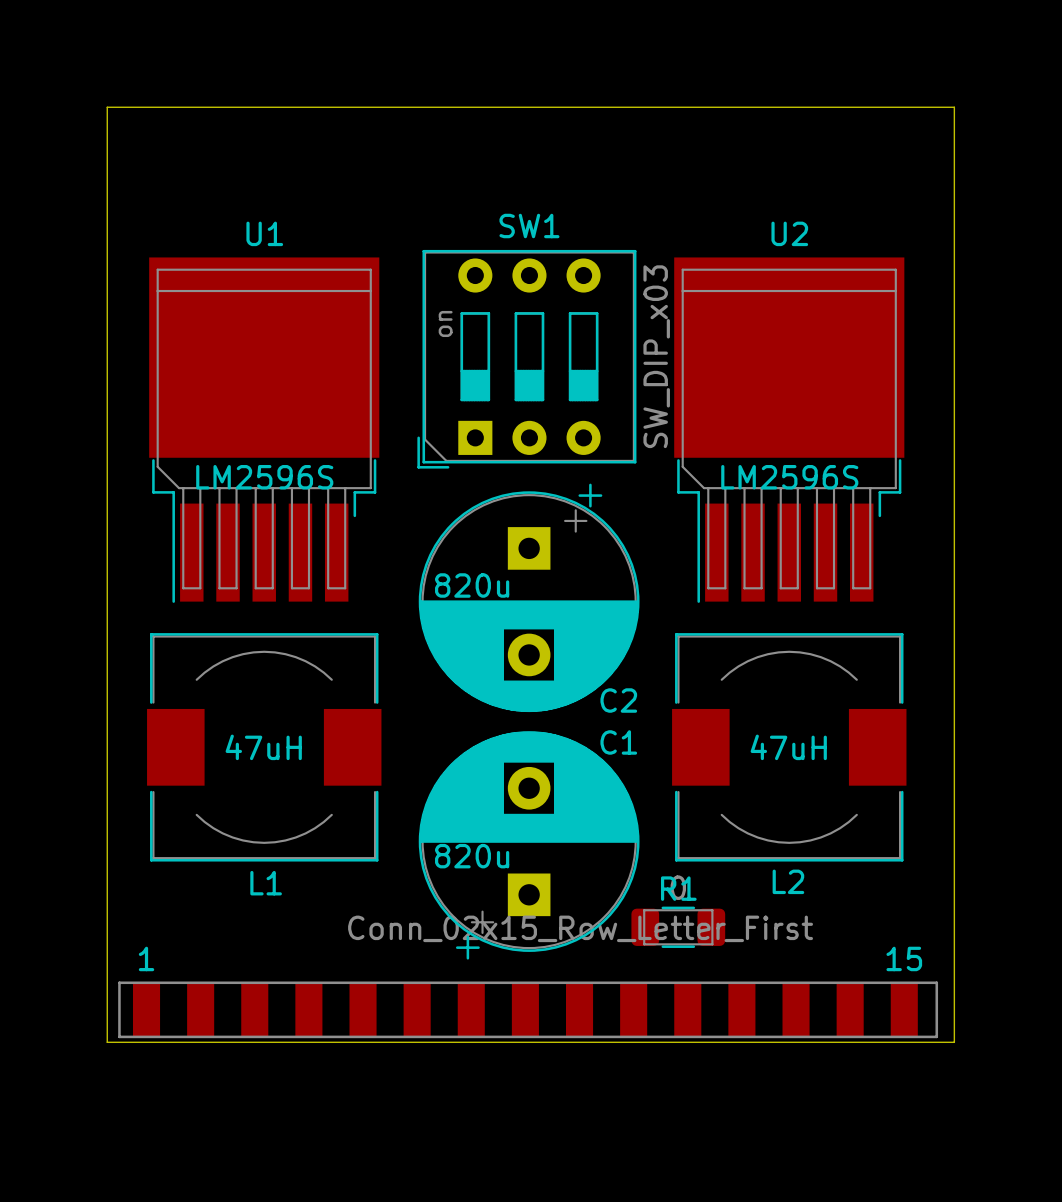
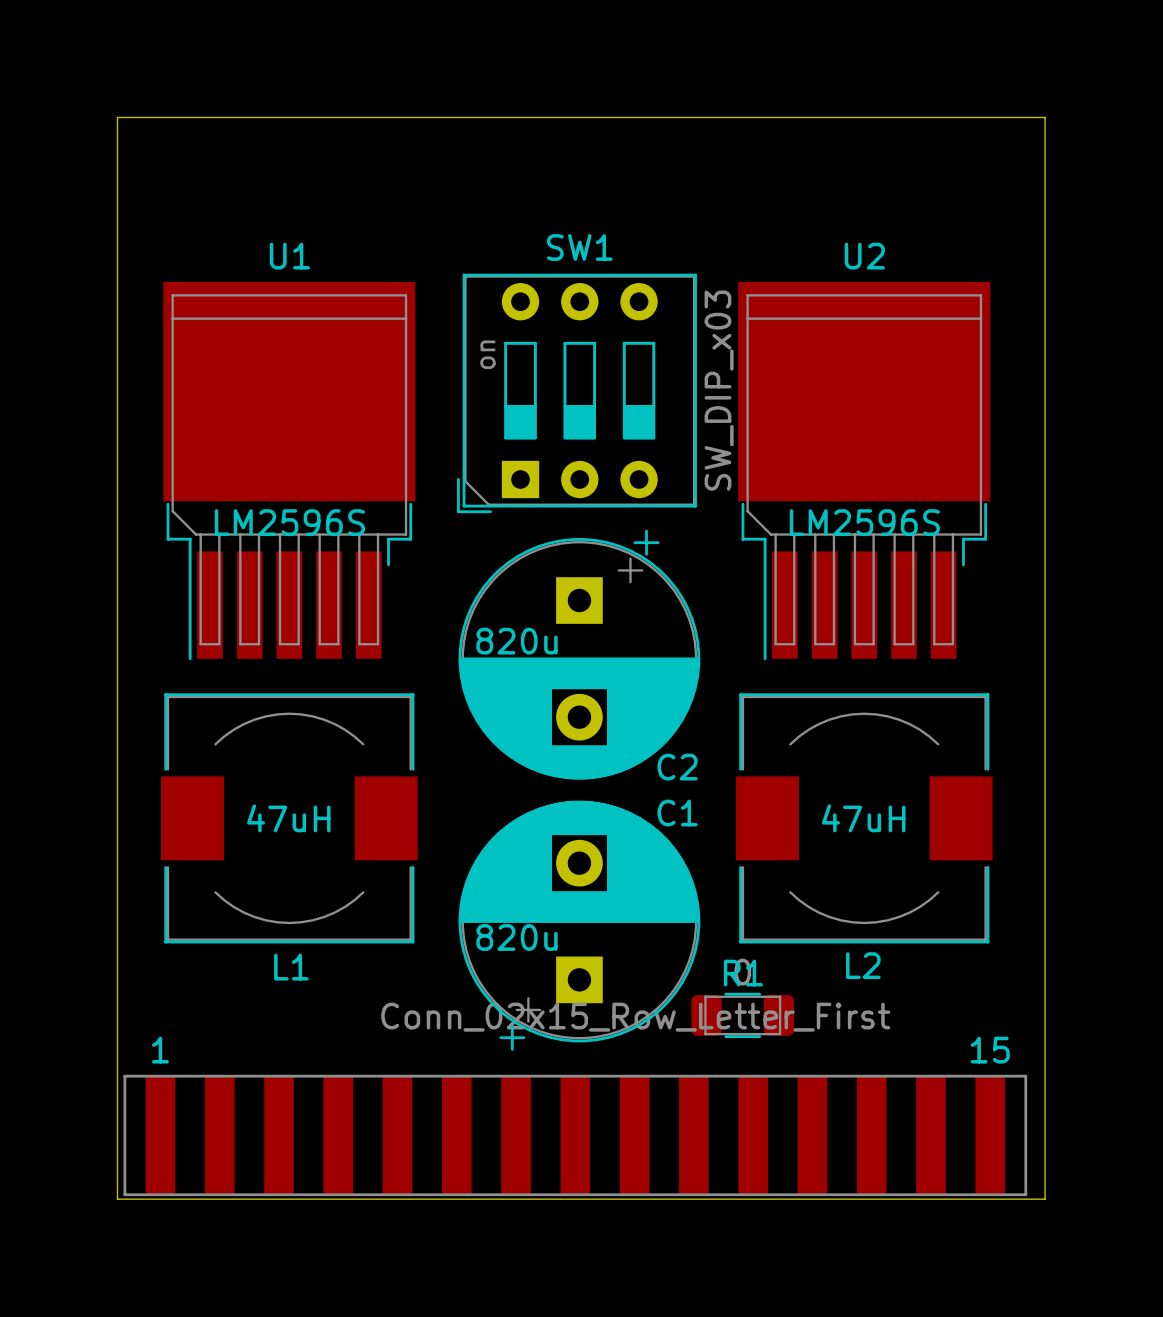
part: Conn_02x15_Row_Letter_First (528, 1009) -> none
part: none -> Conn_02x15_Row_Letter_First (575, 1135)
board edge: (107, 1042) (954, 1042) -> (117, 1141) (117, 1199) (1045, 1199) (1045, 1141)

